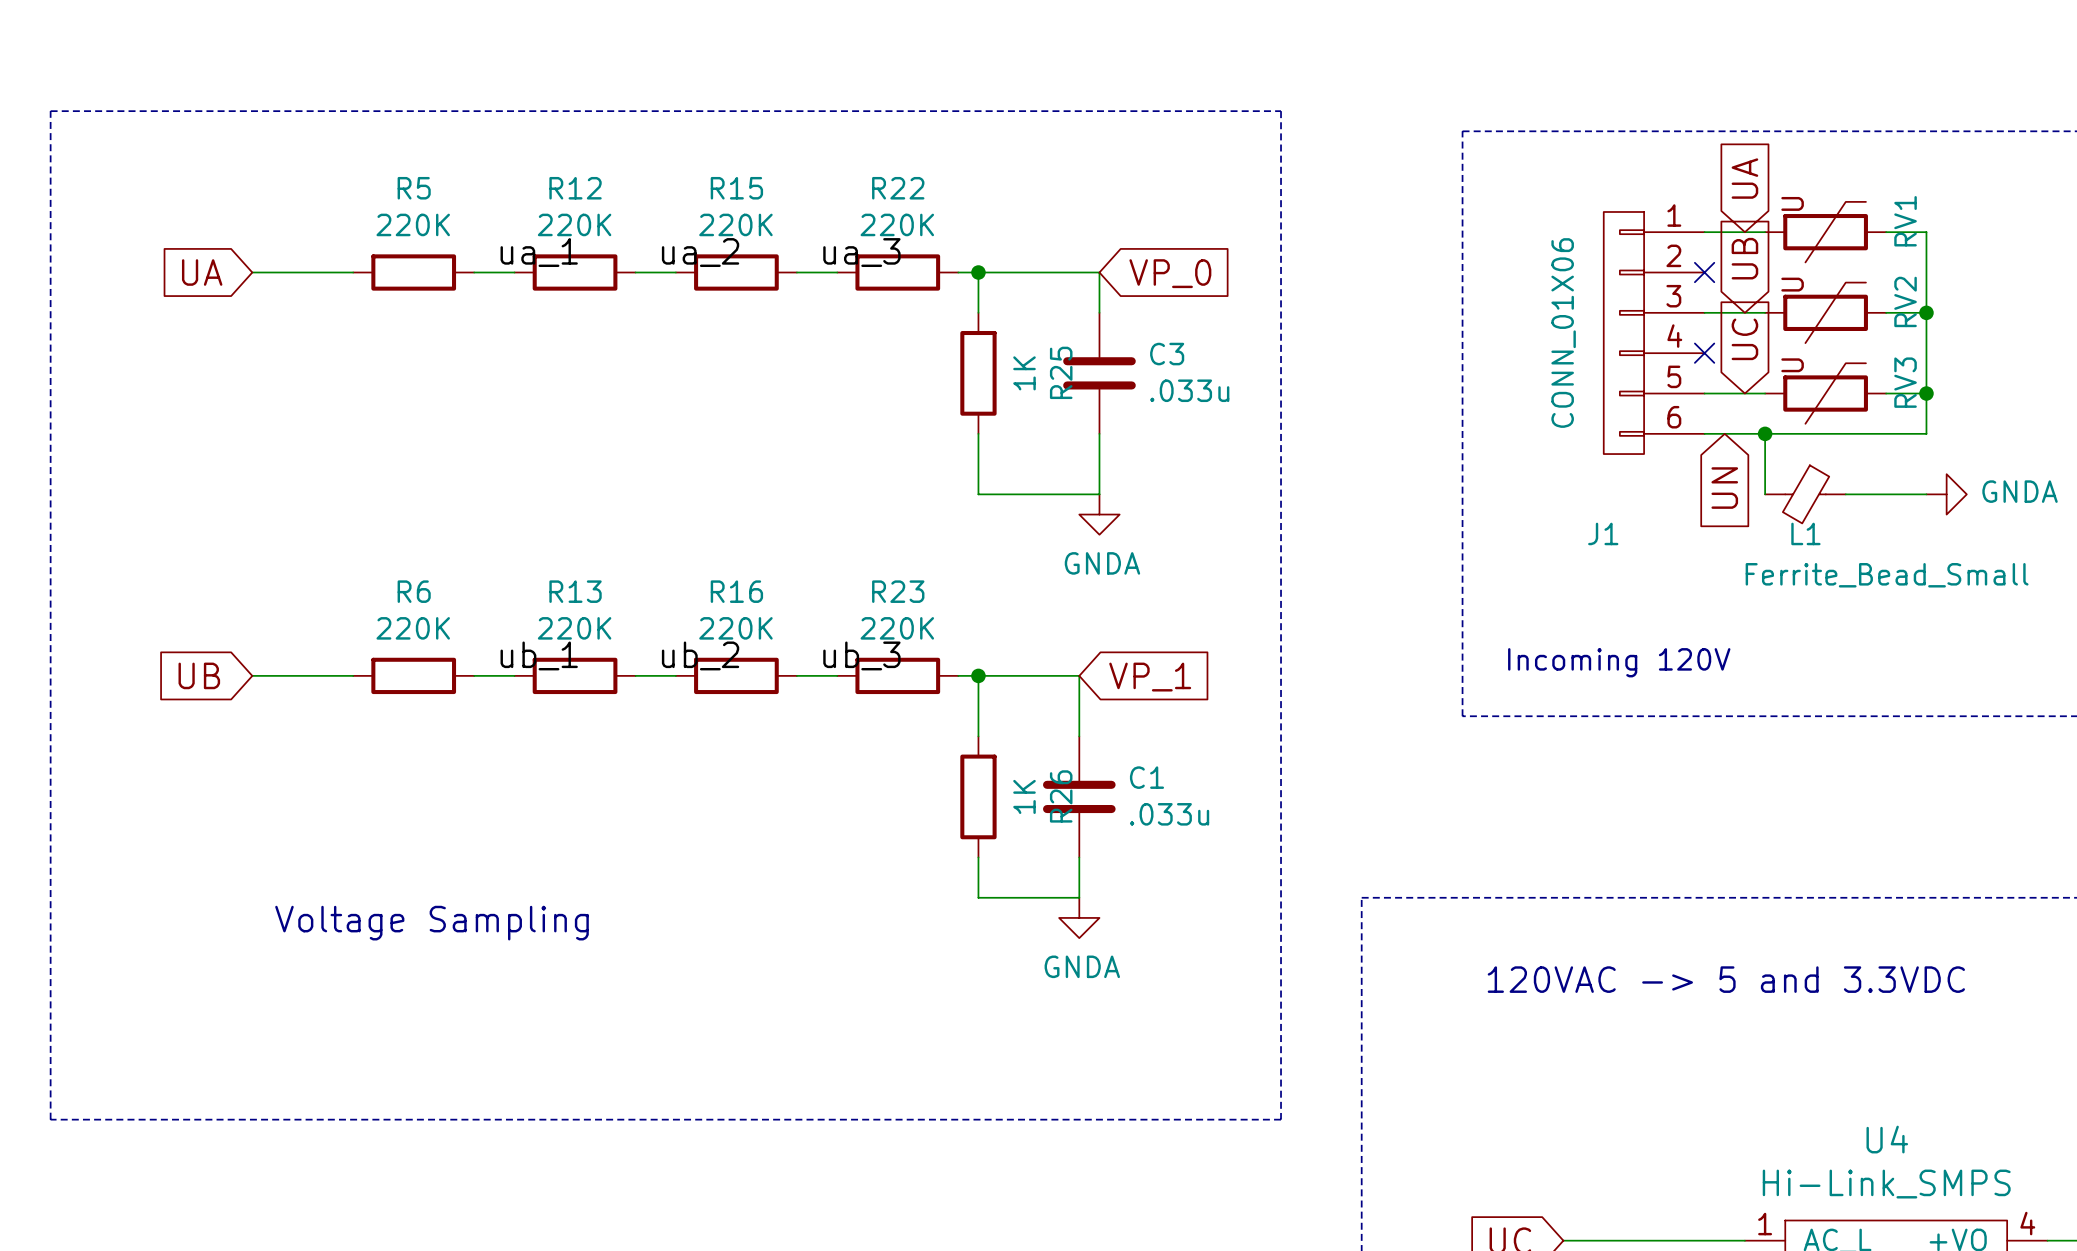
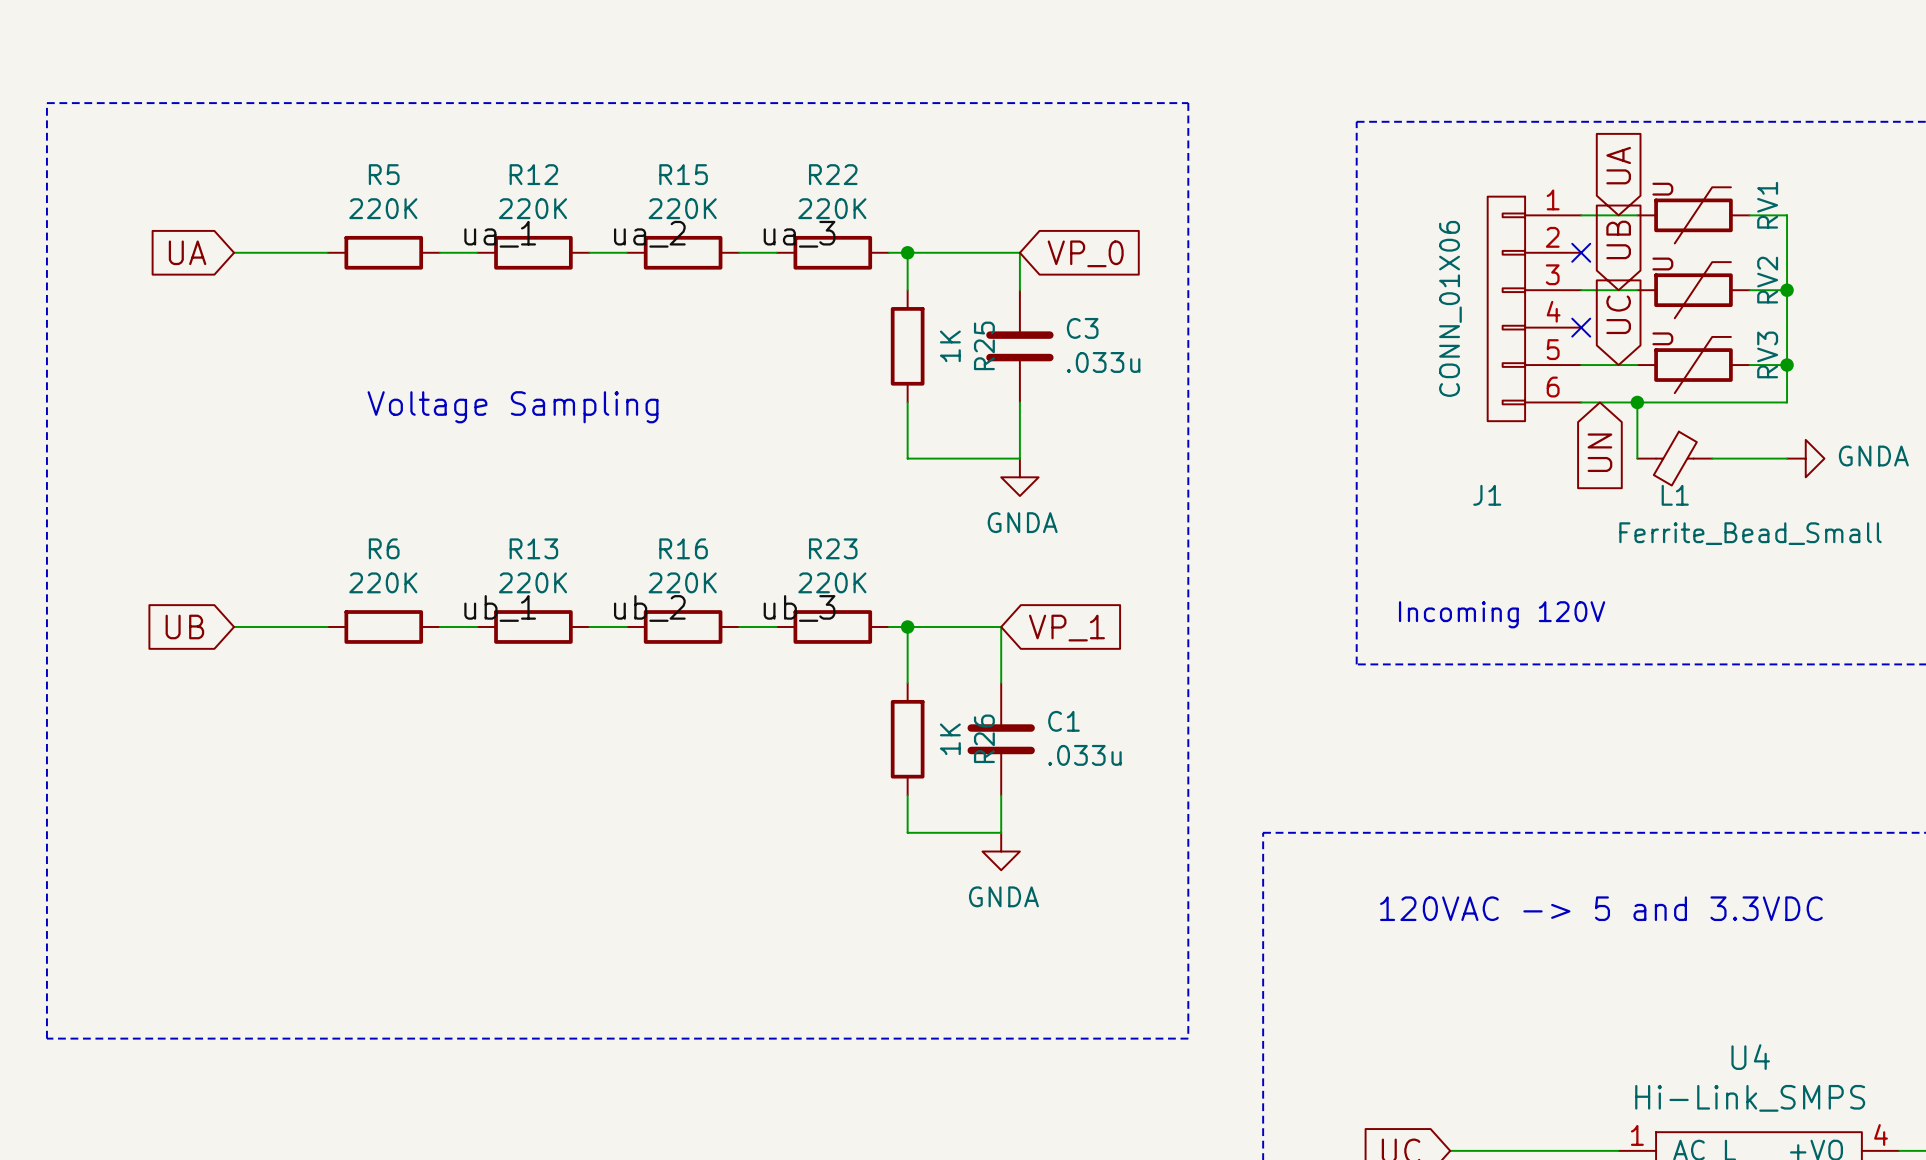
text: none -> Voltage Sampling (512, 407)
text: Voltage Sampling (432, 923) -> none

